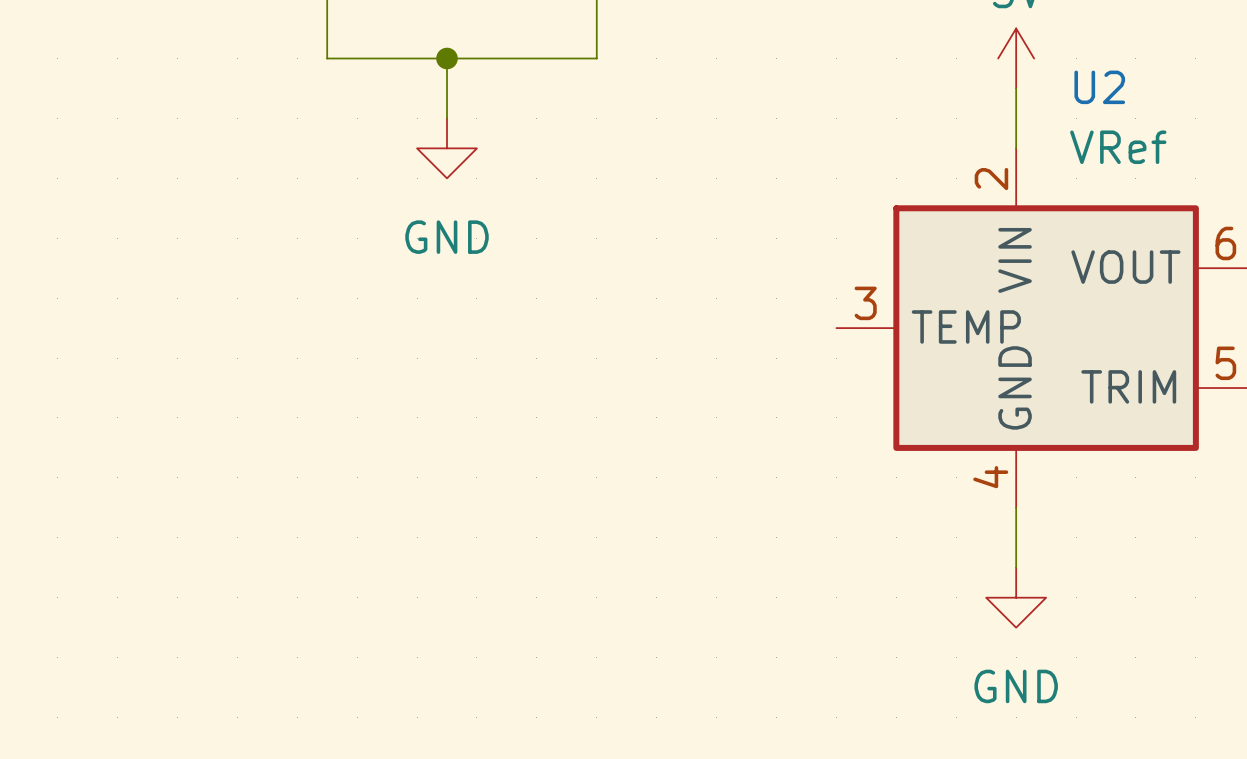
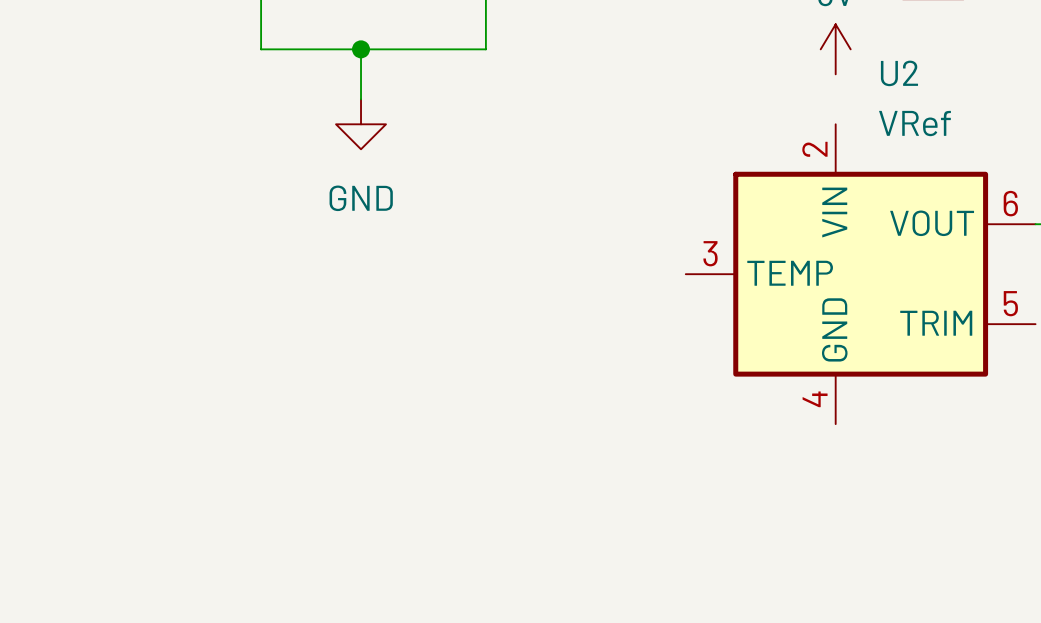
wire: (1016, 88) (1016, 148) -> none
wire: (1016, 507) (1016, 567) -> none
power symbol: GND (1016, 597) -> none

